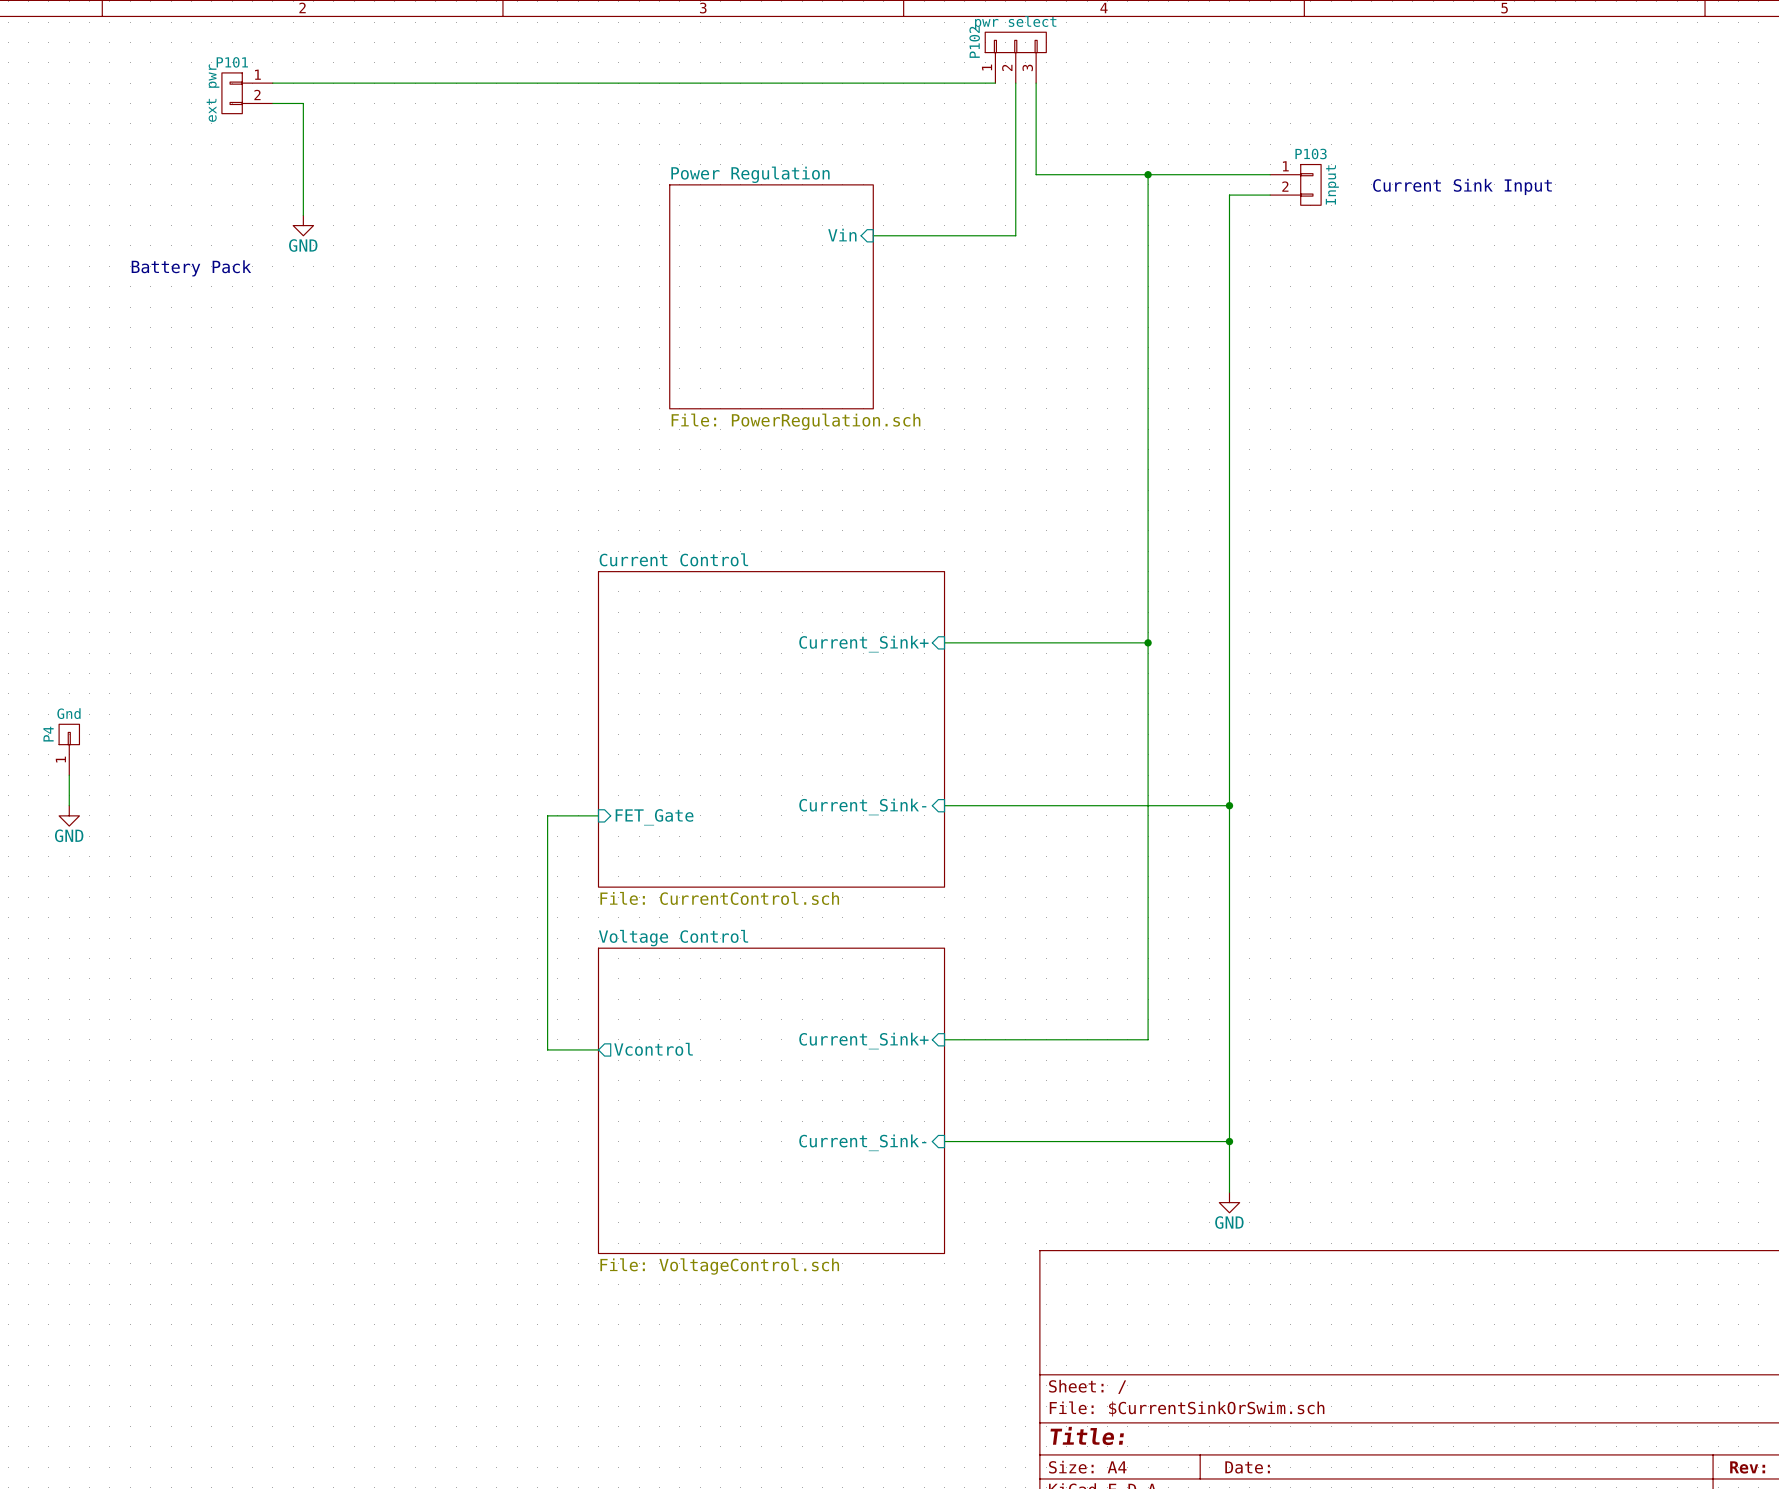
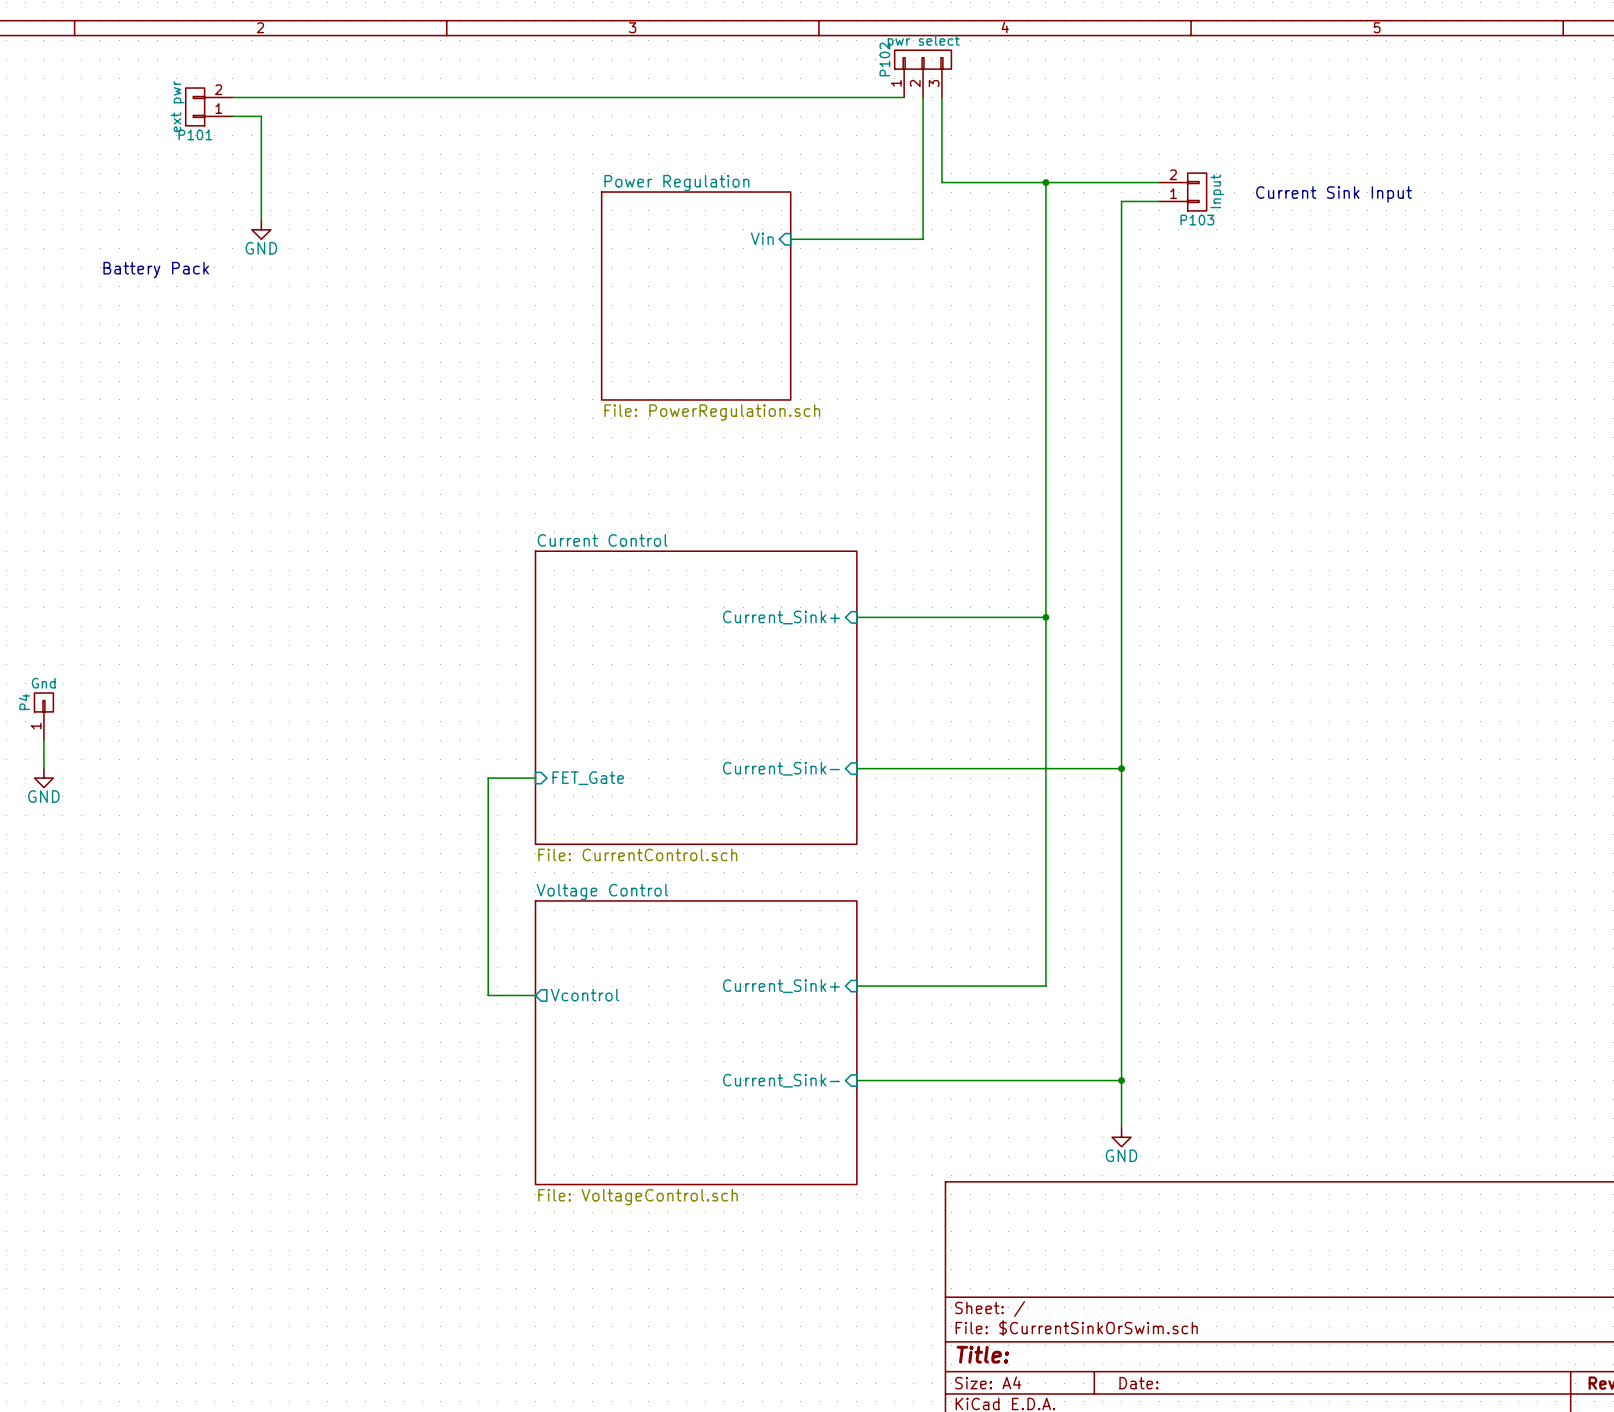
P101 flip: as is (232, 93) -> up-down (195, 106)
P103 flip: as is (1310, 184) -> up-down (1197, 192)

